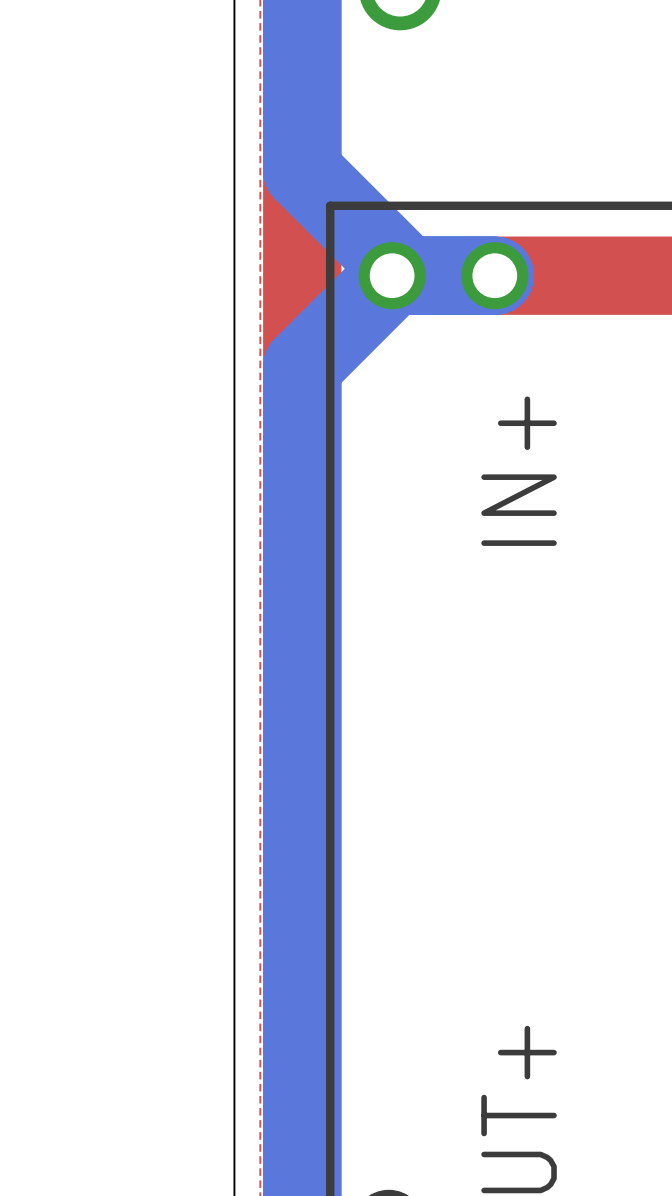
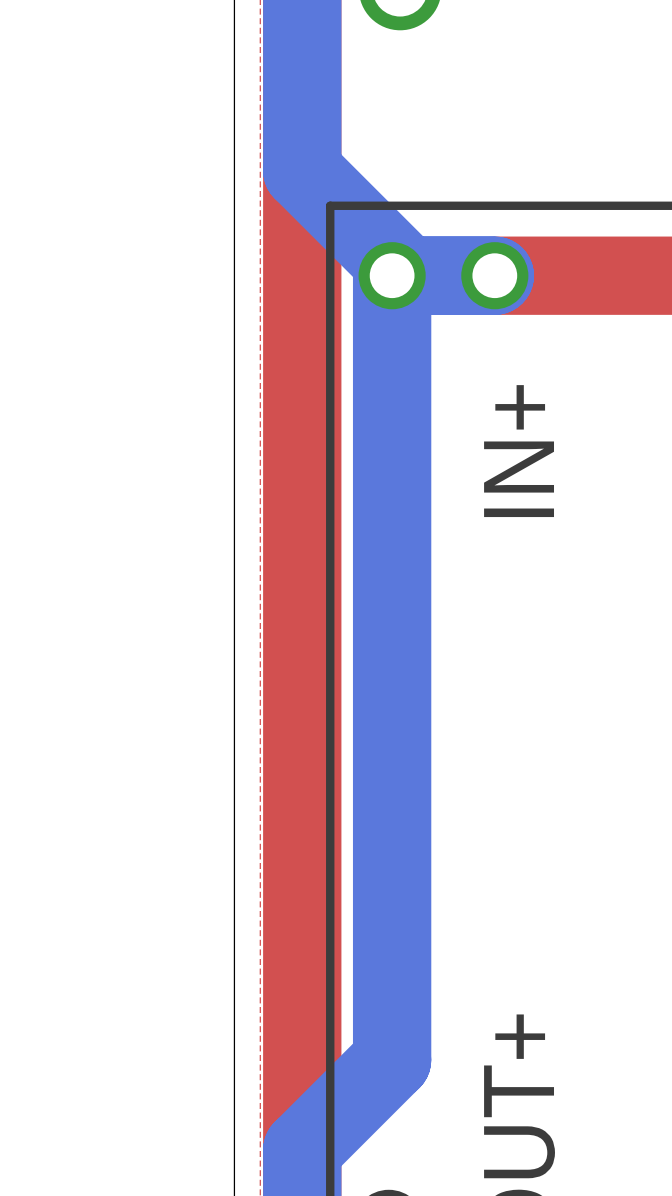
bottom track: (392, 276) (302, 366) (302, 1149) -> (392, 276) (392, 1059) (302, 1149)

